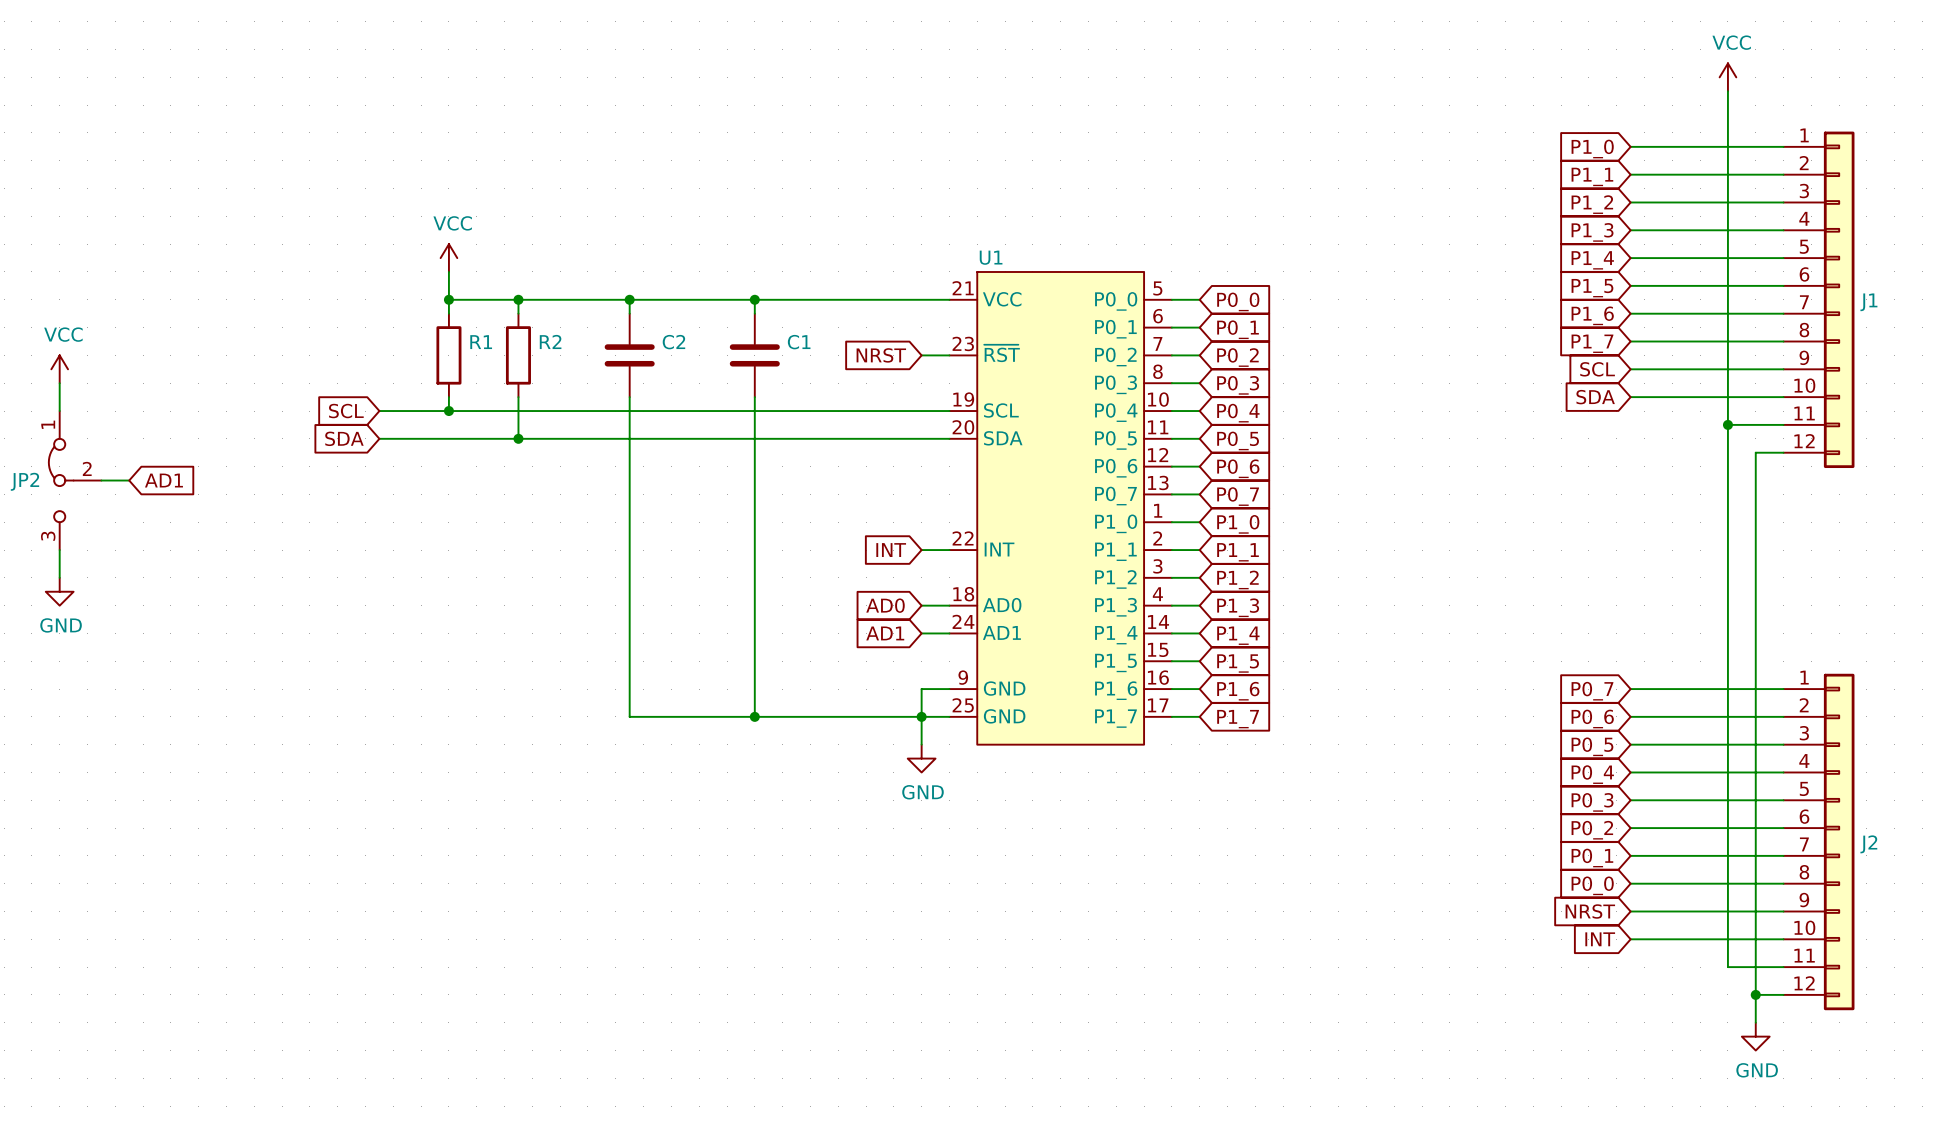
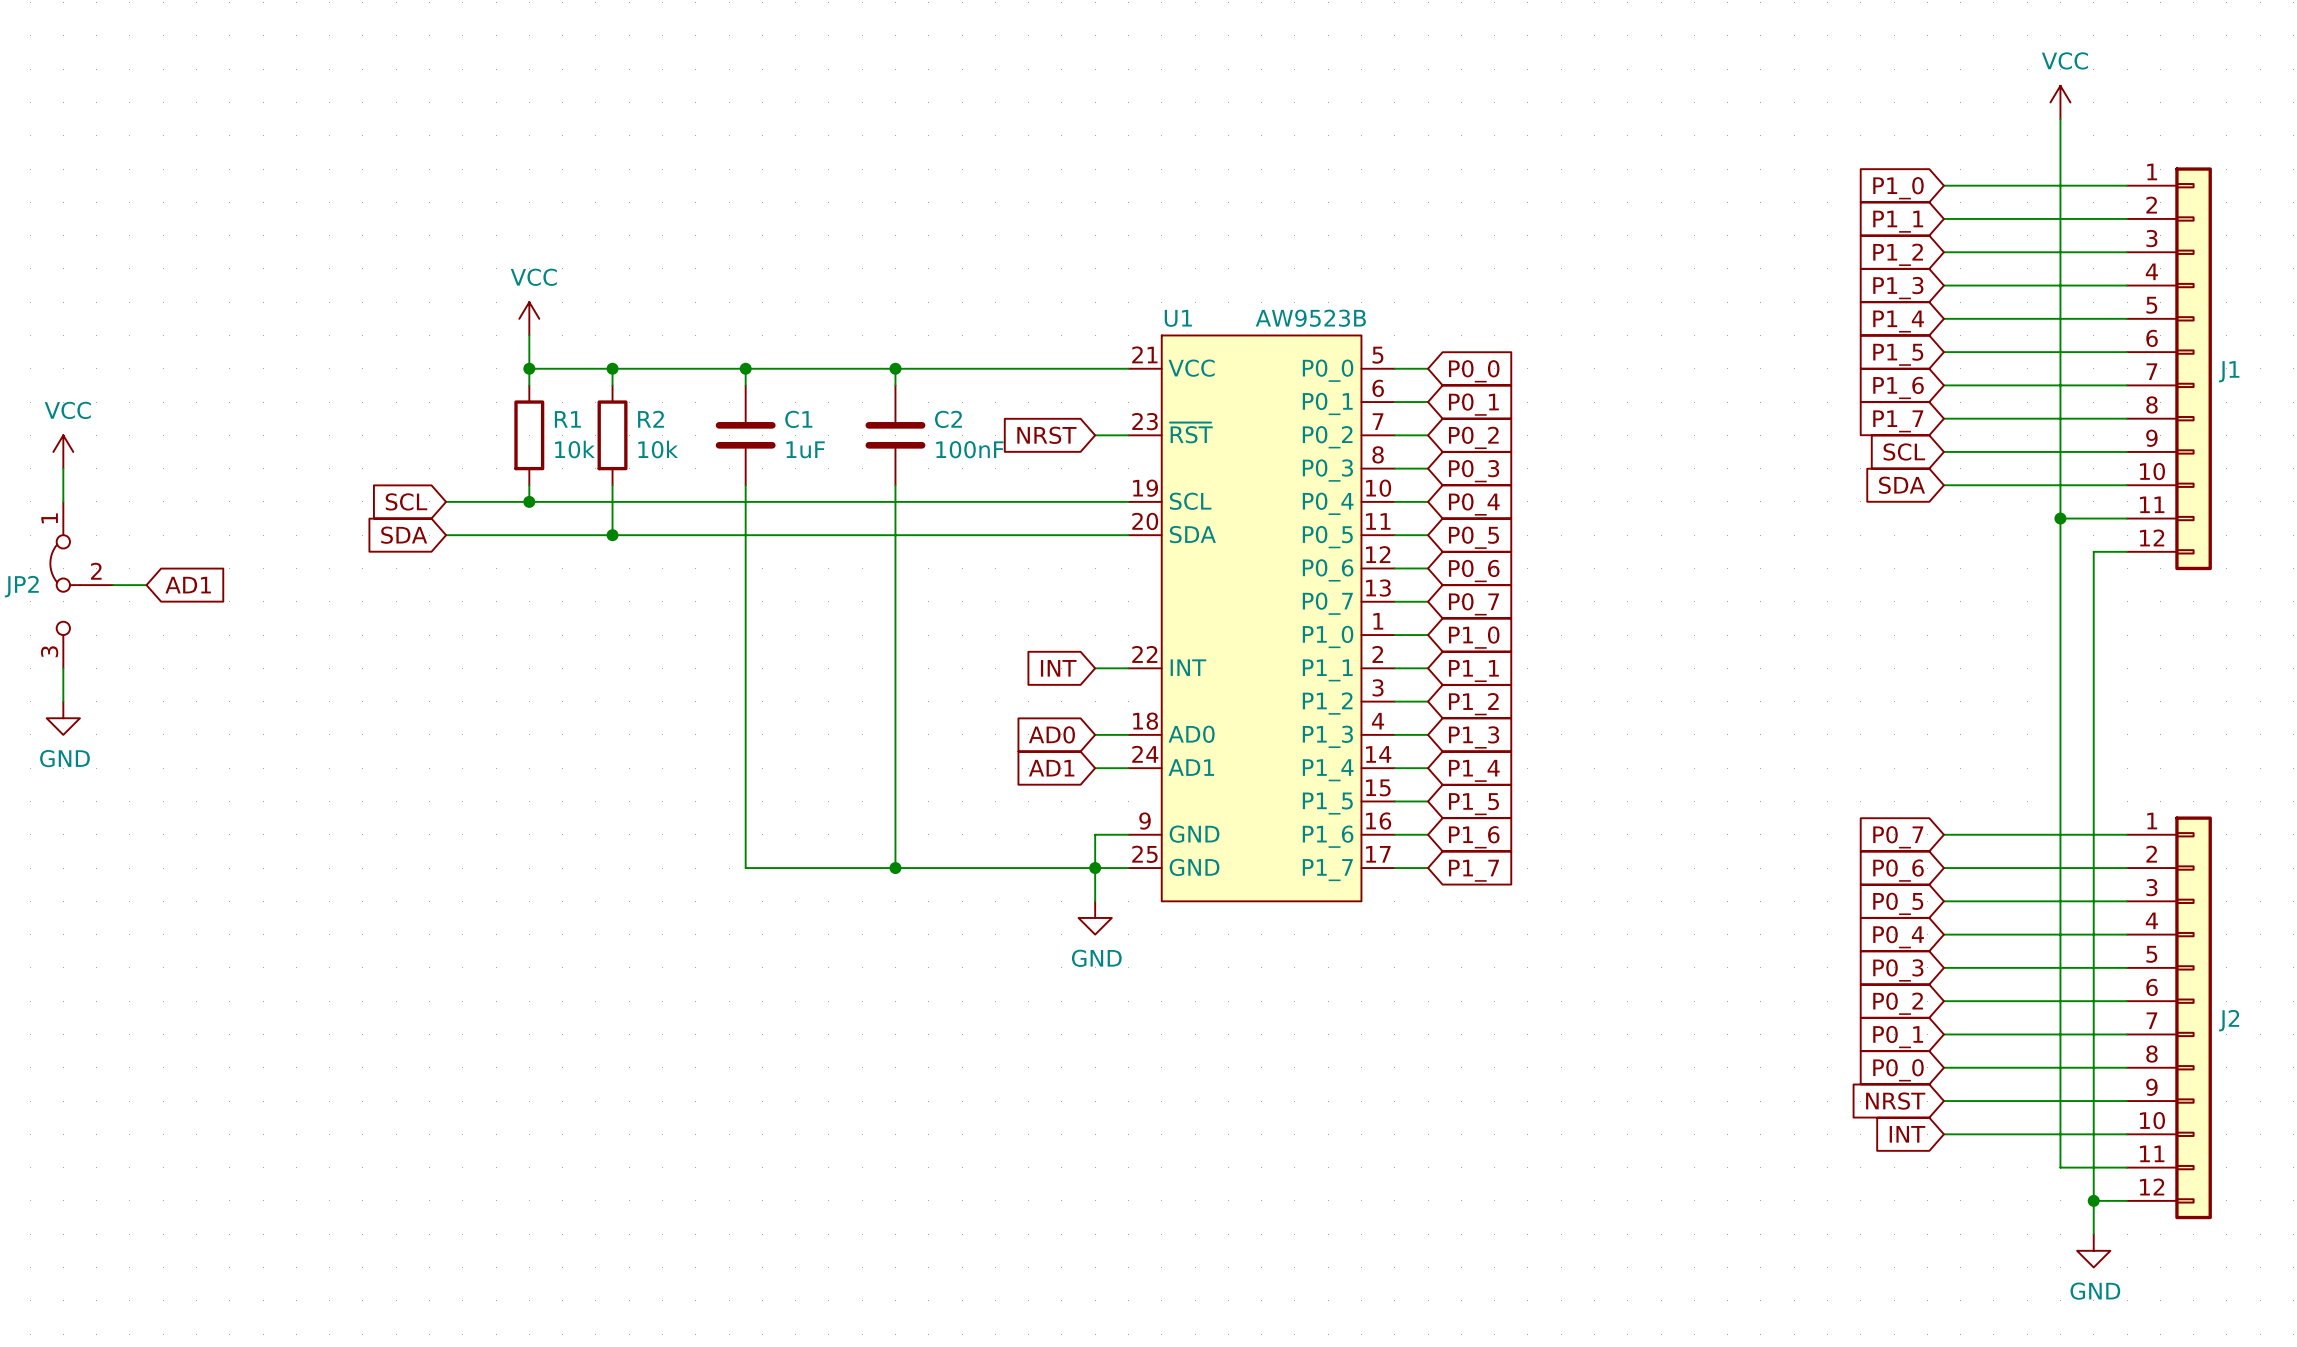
U1 value: none -> AW9523B (1310, 318)
C2 name: C2 (673, 342) -> C1 (798, 419)
C1 name: C1 (799, 342) -> C2 (948, 419)
R1 value: none -> 10k (574, 449)
R2 value: none -> 10k (658, 449)
C2 value: none -> 1uF (805, 449)
C1 value: none -> 100nF (969, 449)

